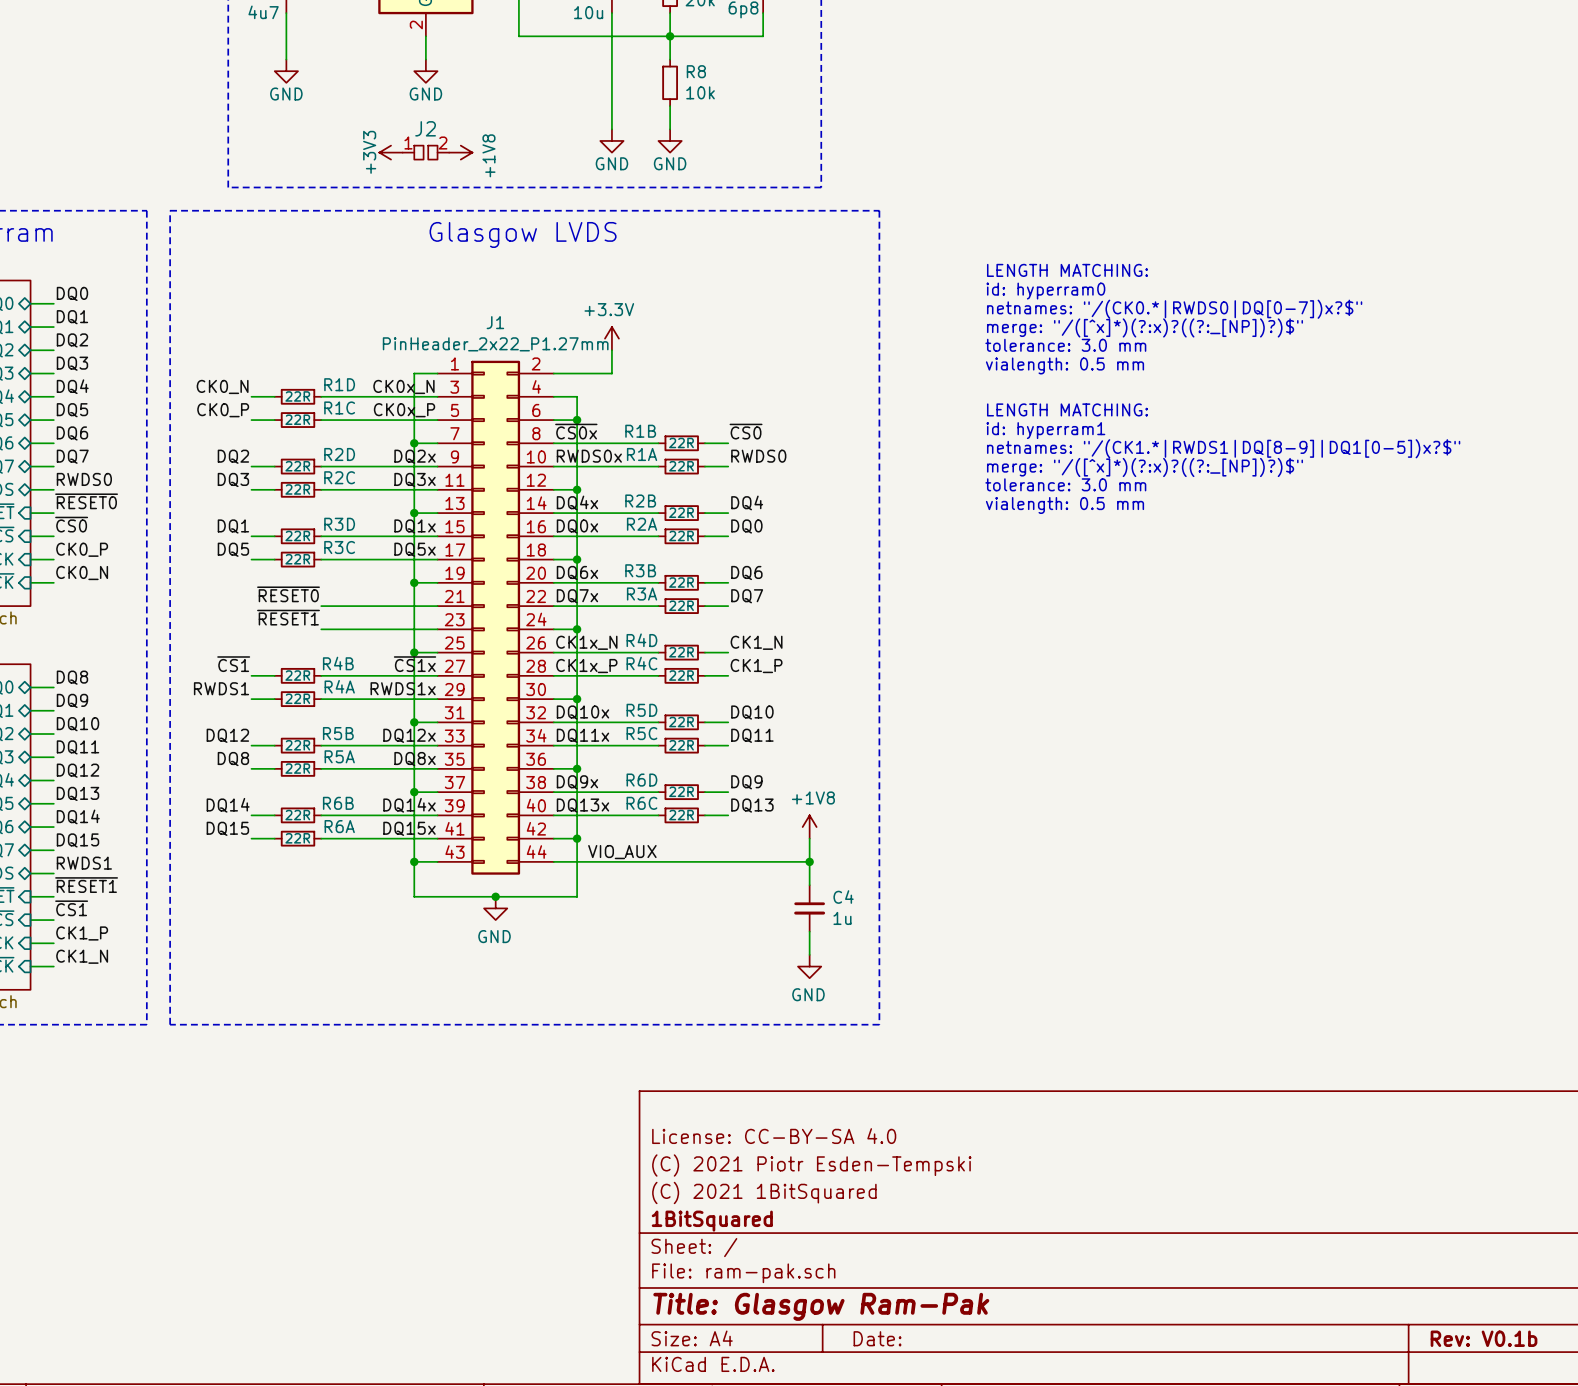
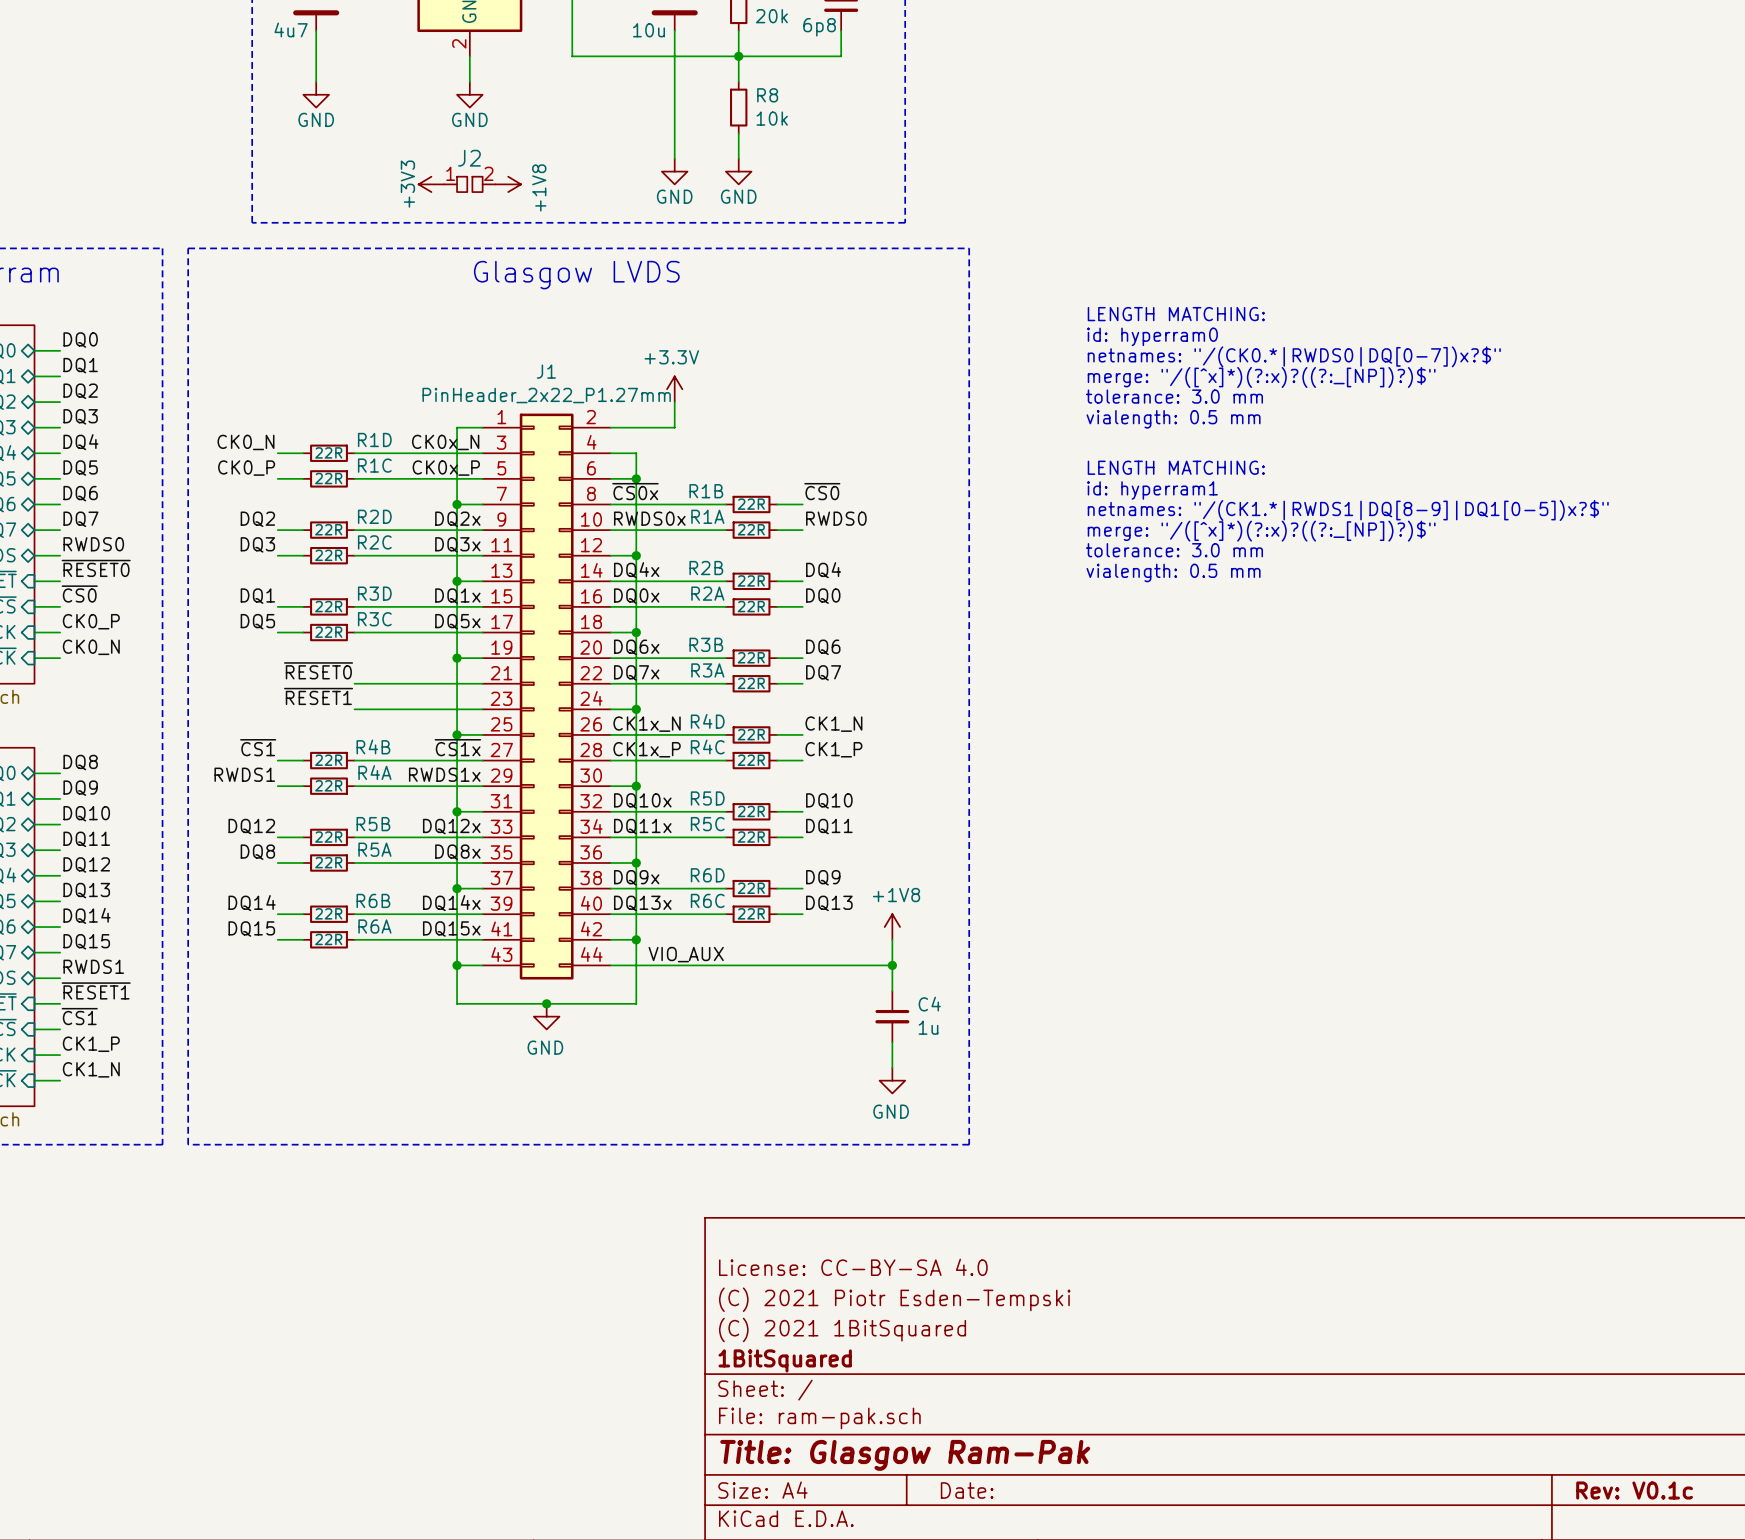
title block: Rev: V0.1b (1484, 1338) -> Rev: V0.1c (1634, 1490)

